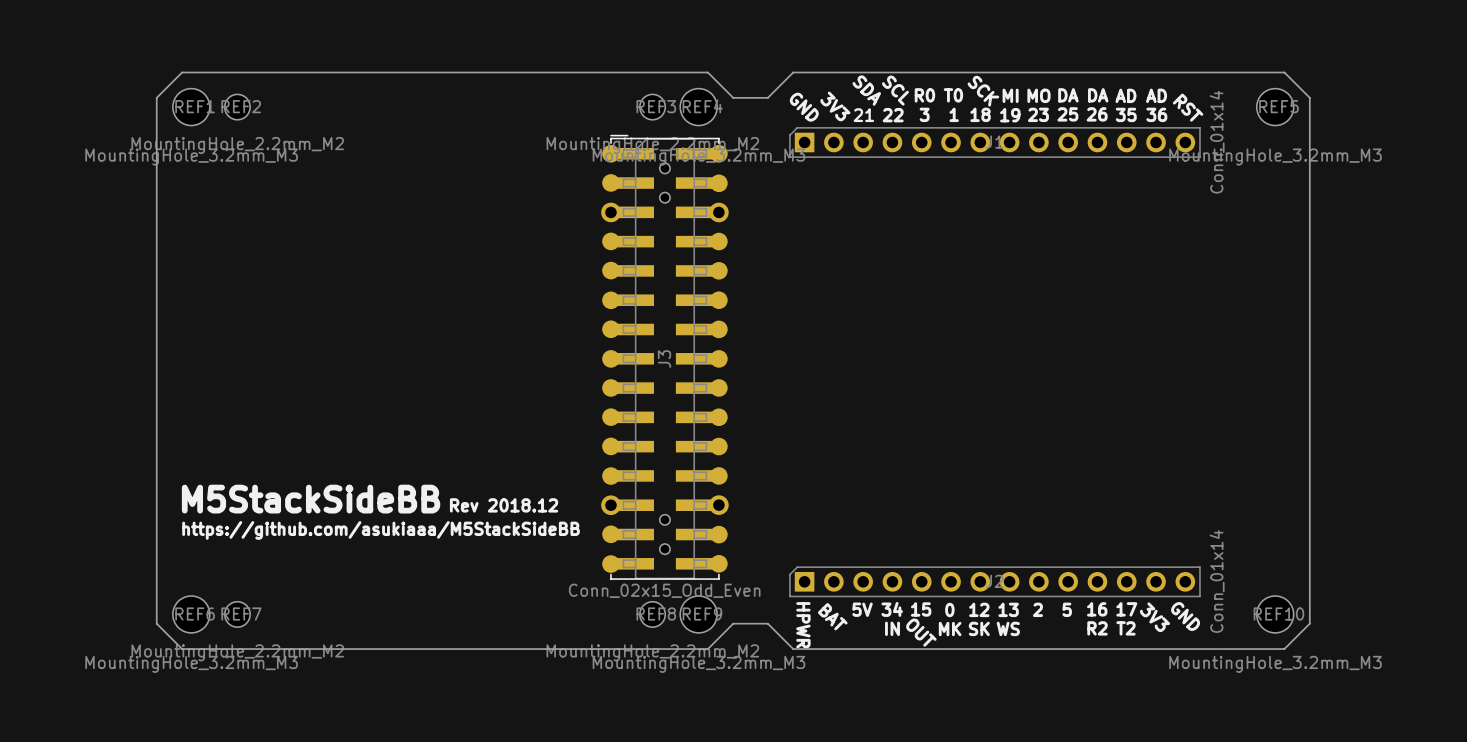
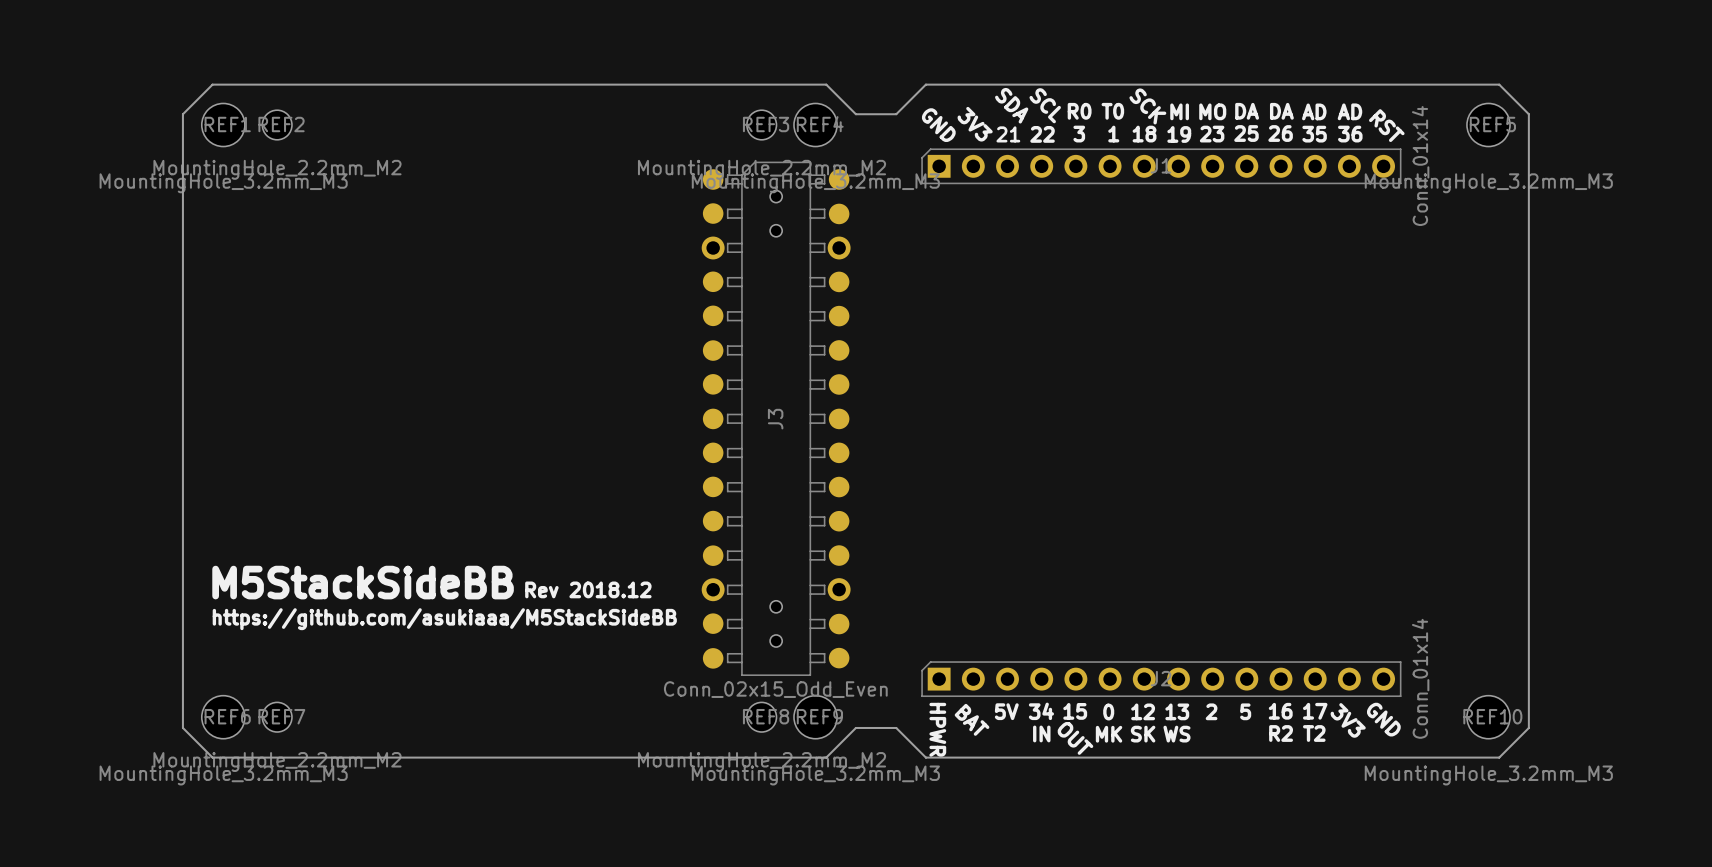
J3 footprint: [601, 134, 729, 580] -> [701, 161, 851, 676]

